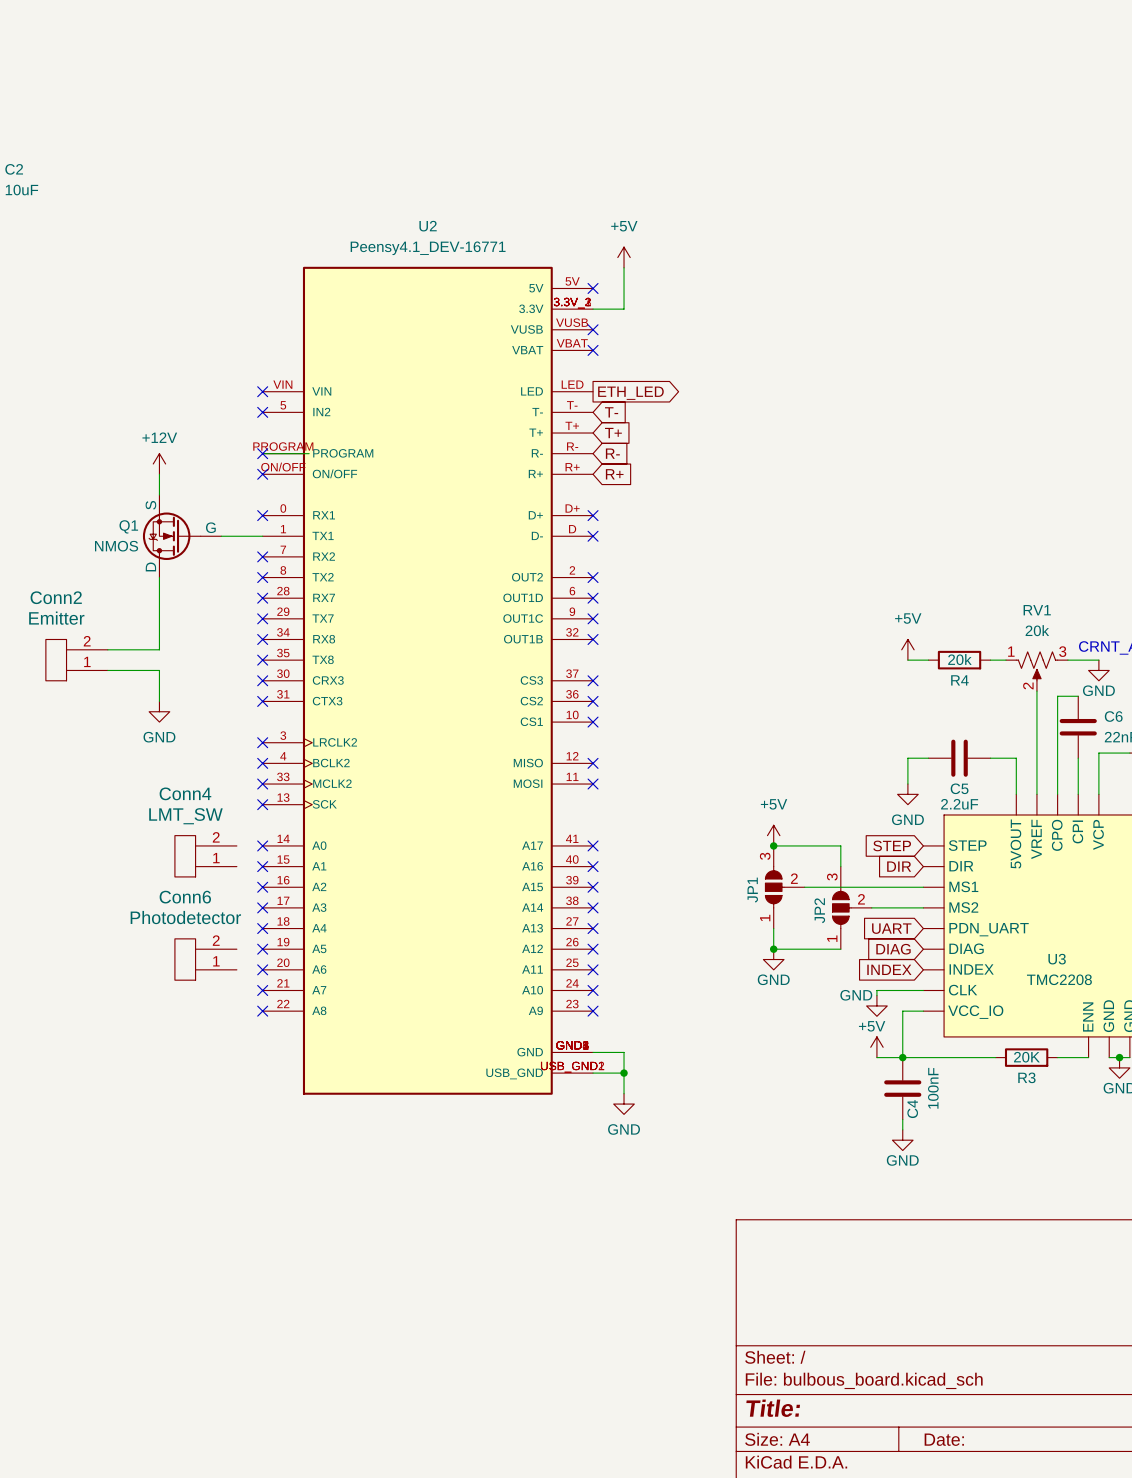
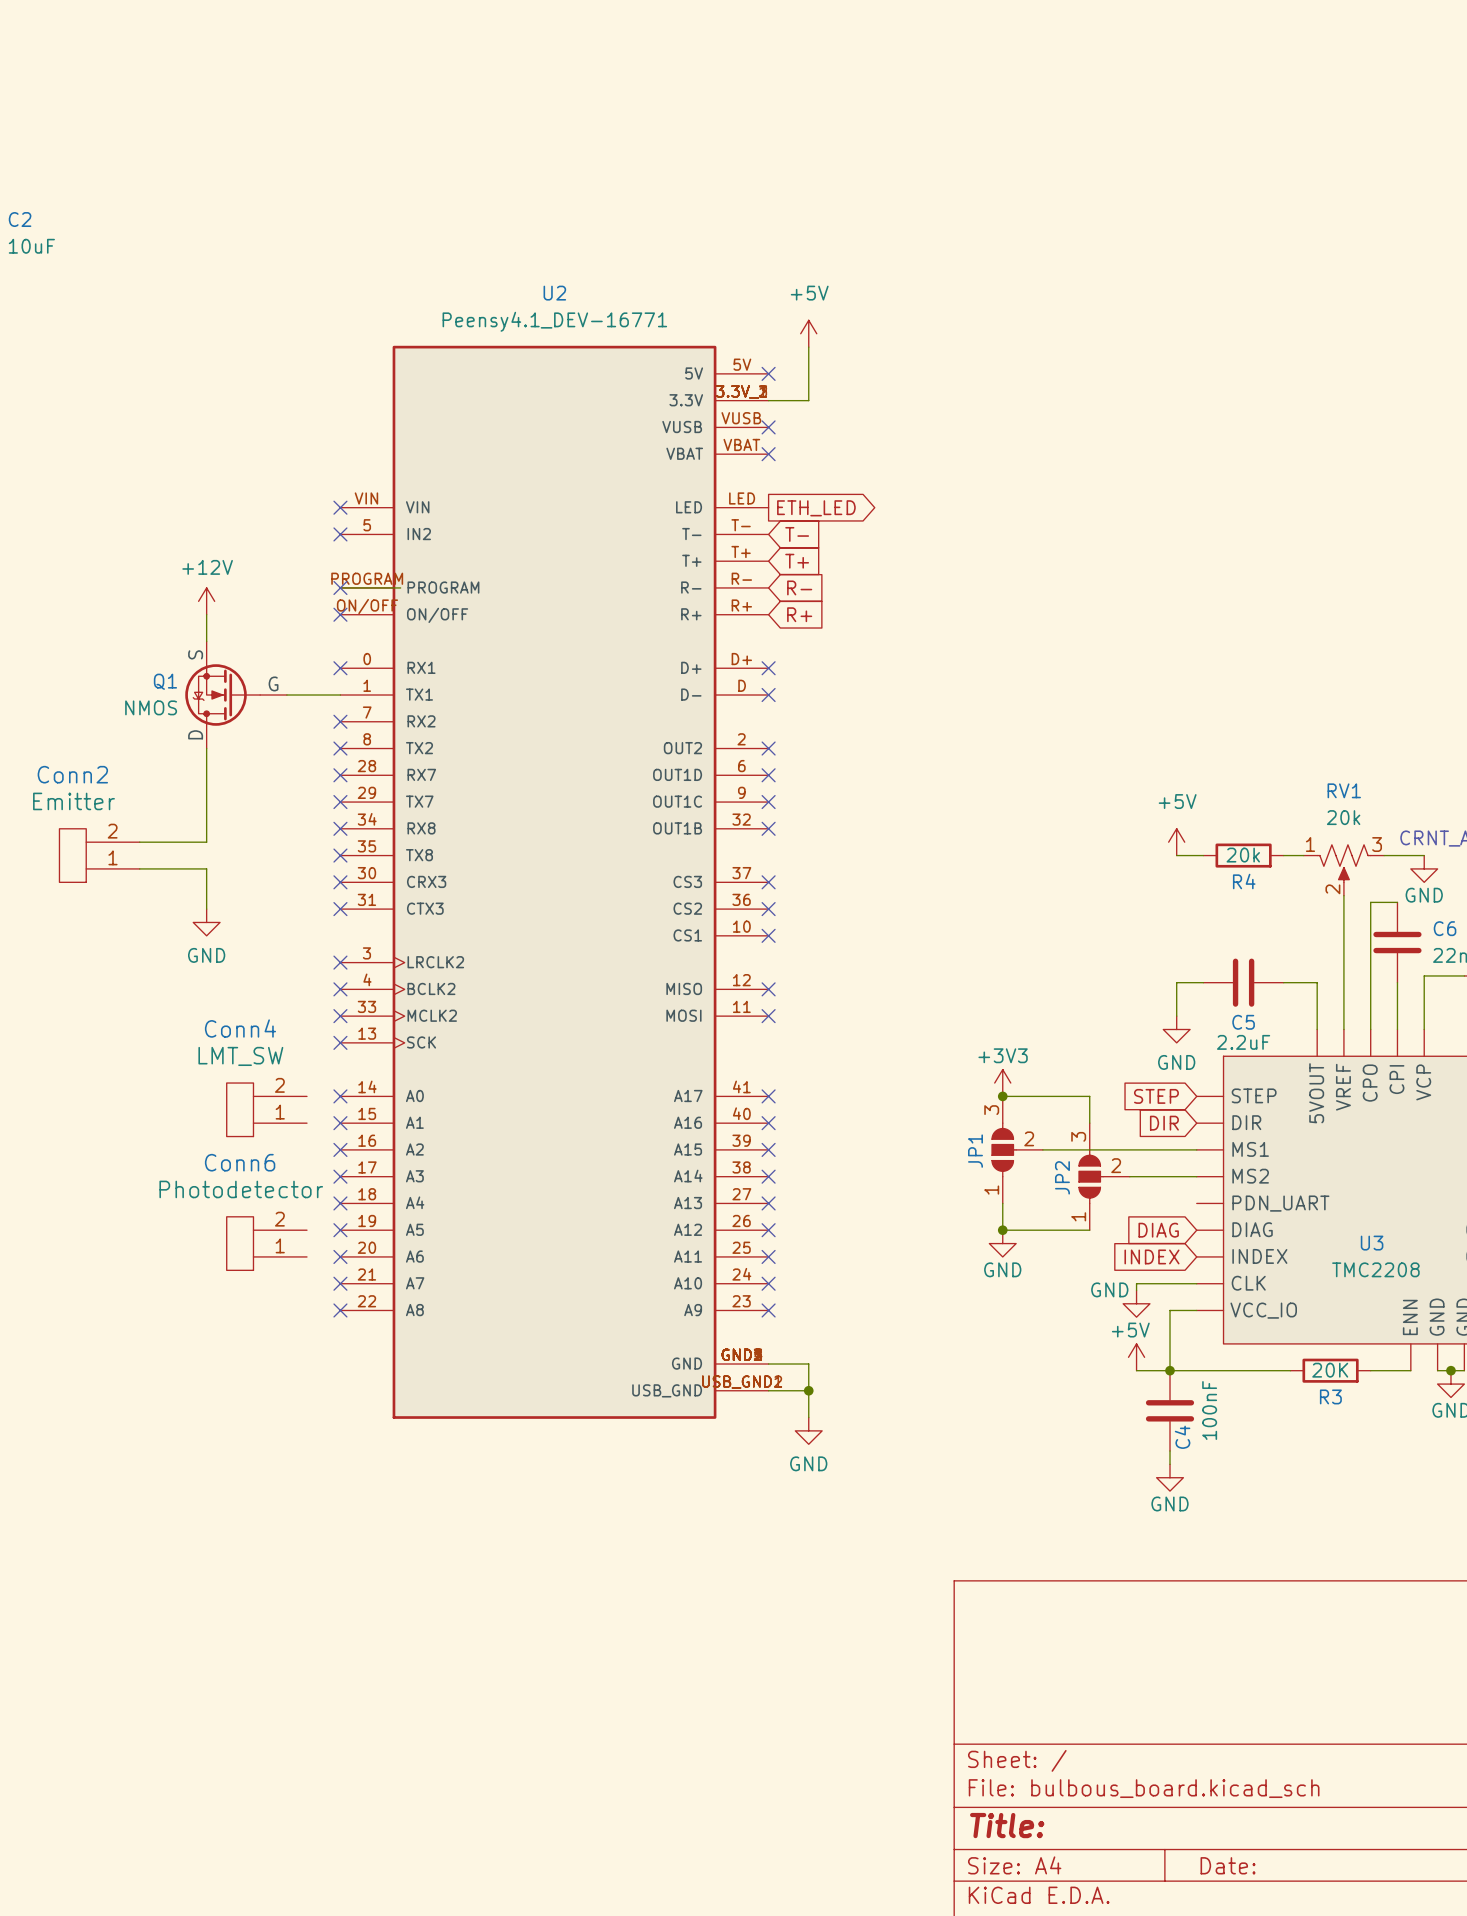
power symbol: +5V (773, 835) -> +3V3 (1002, 1083)
global label: UART (891, 928) -> none

